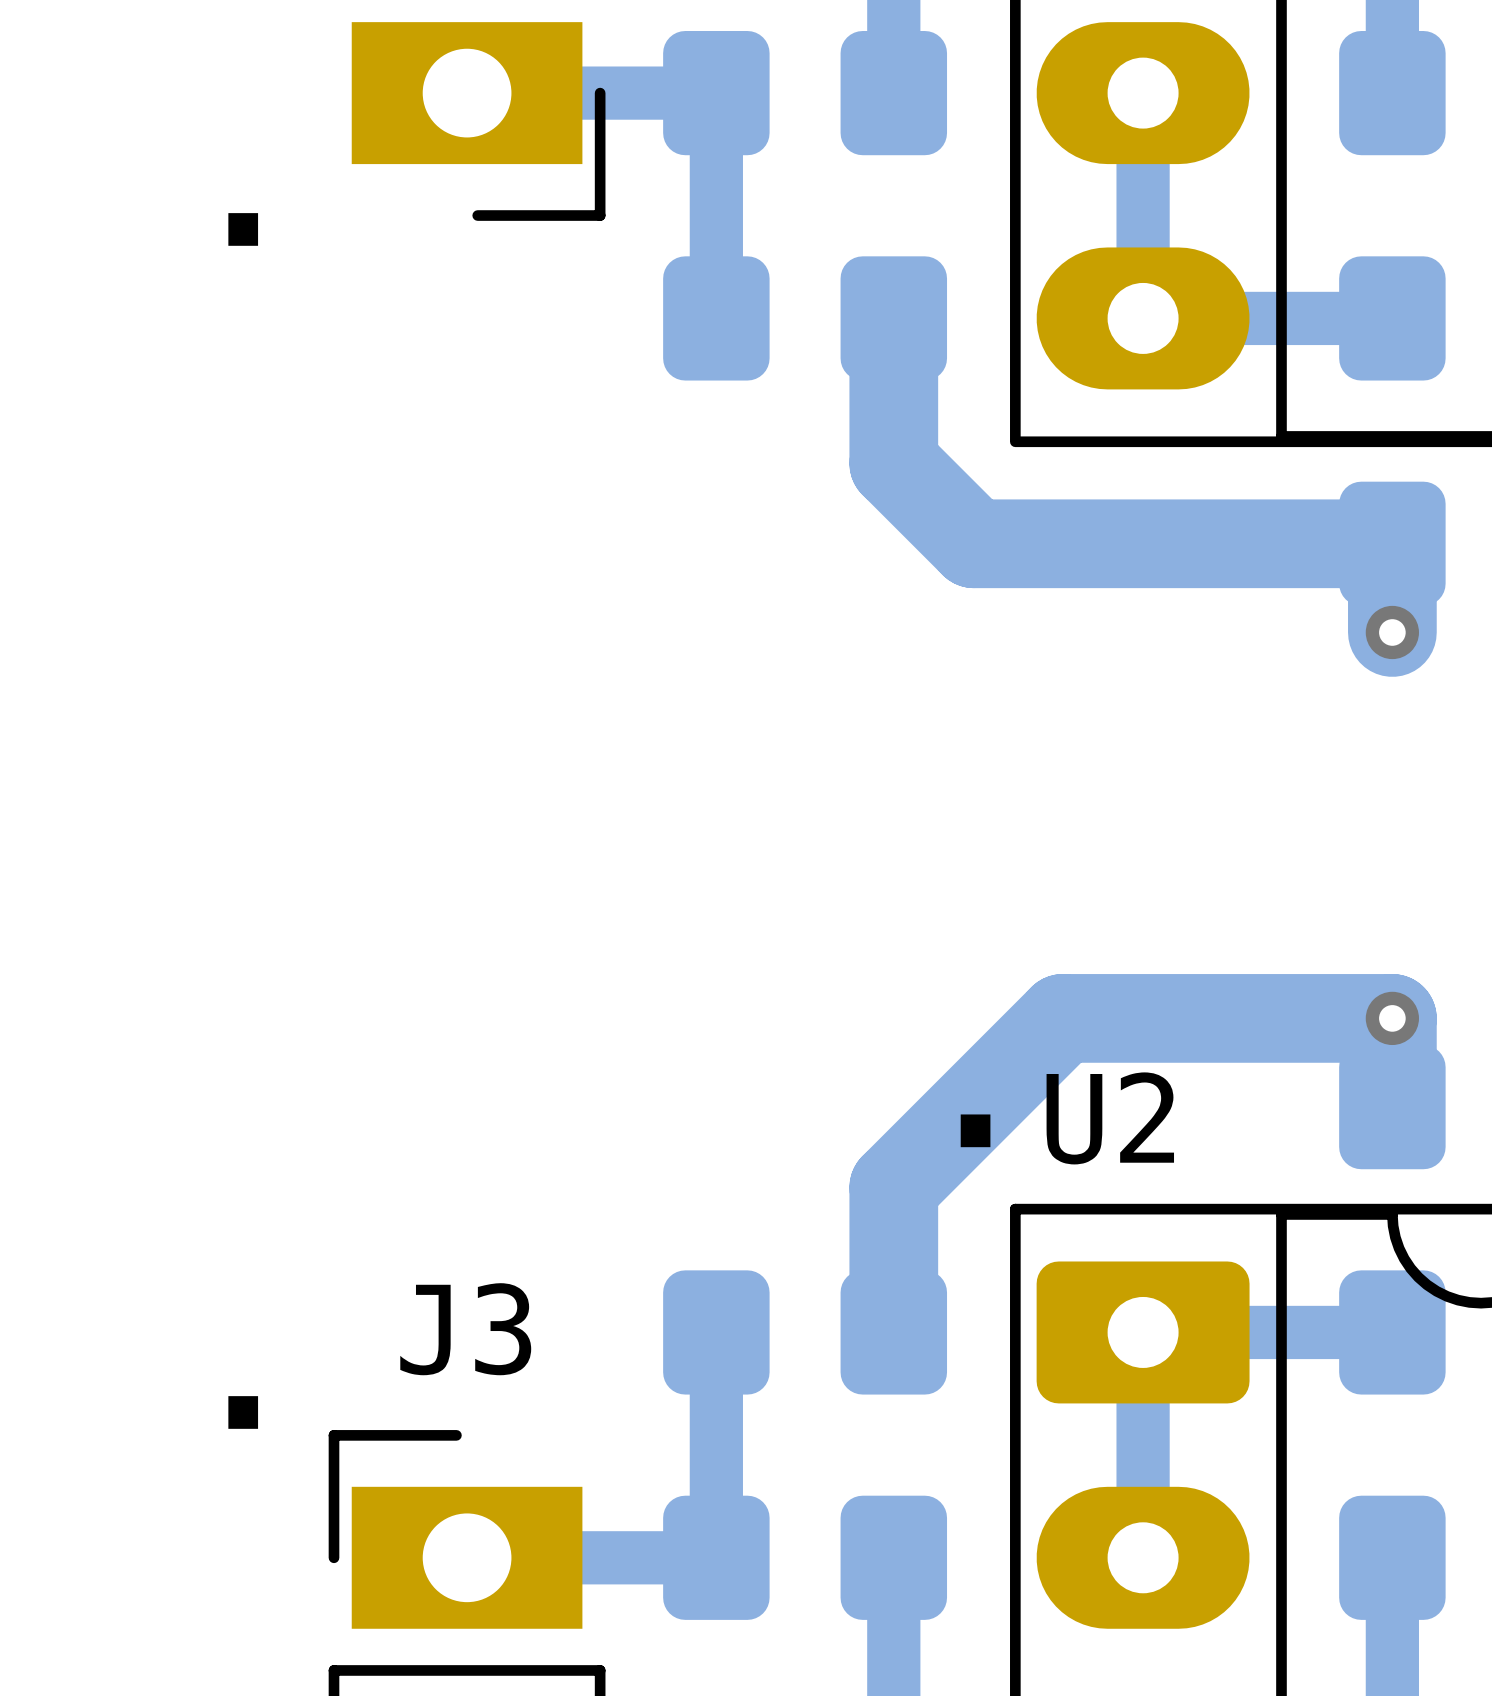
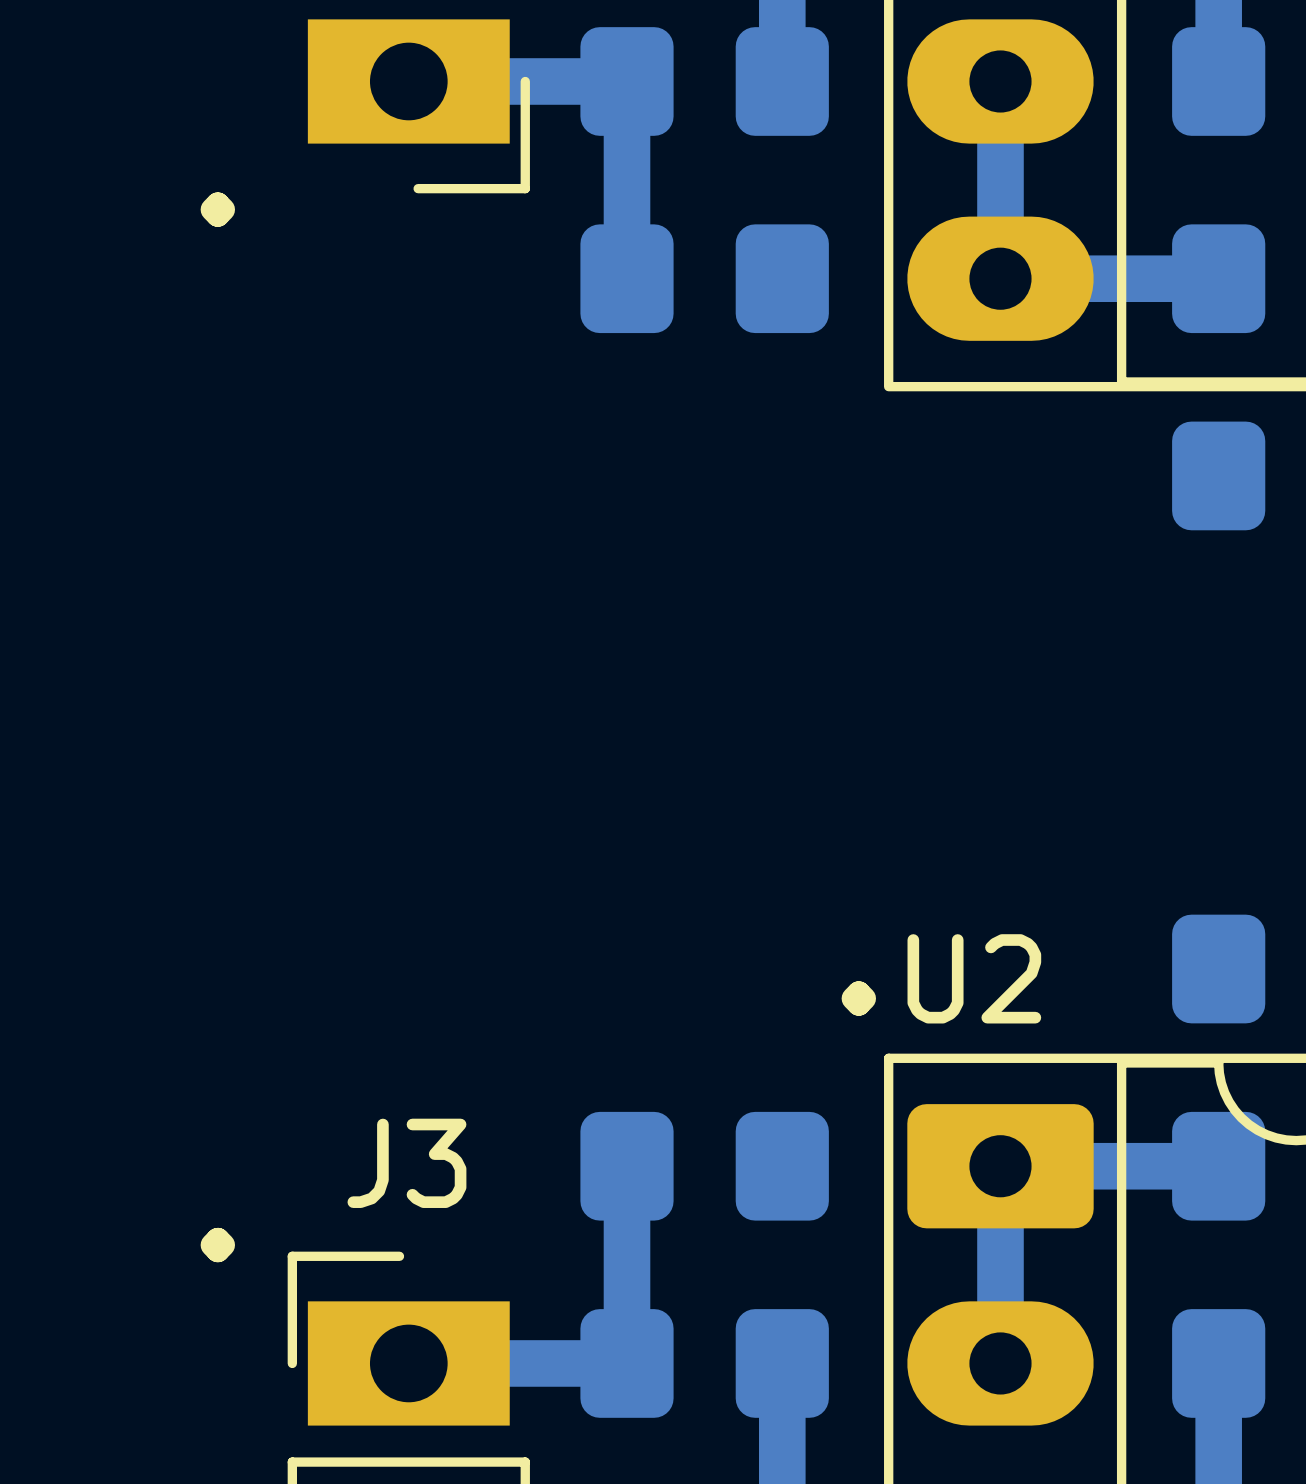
bottom track: (893, 318) (893, 463) (974, 543) (1392, 543) (1392, 632) -> none
via: (1392, 632) -> none
via: (1392, 1018) -> none
bottom track: (1392, 1107) (1392, 1018) (1062, 1018) (893, 1187) (893, 1332) -> none

